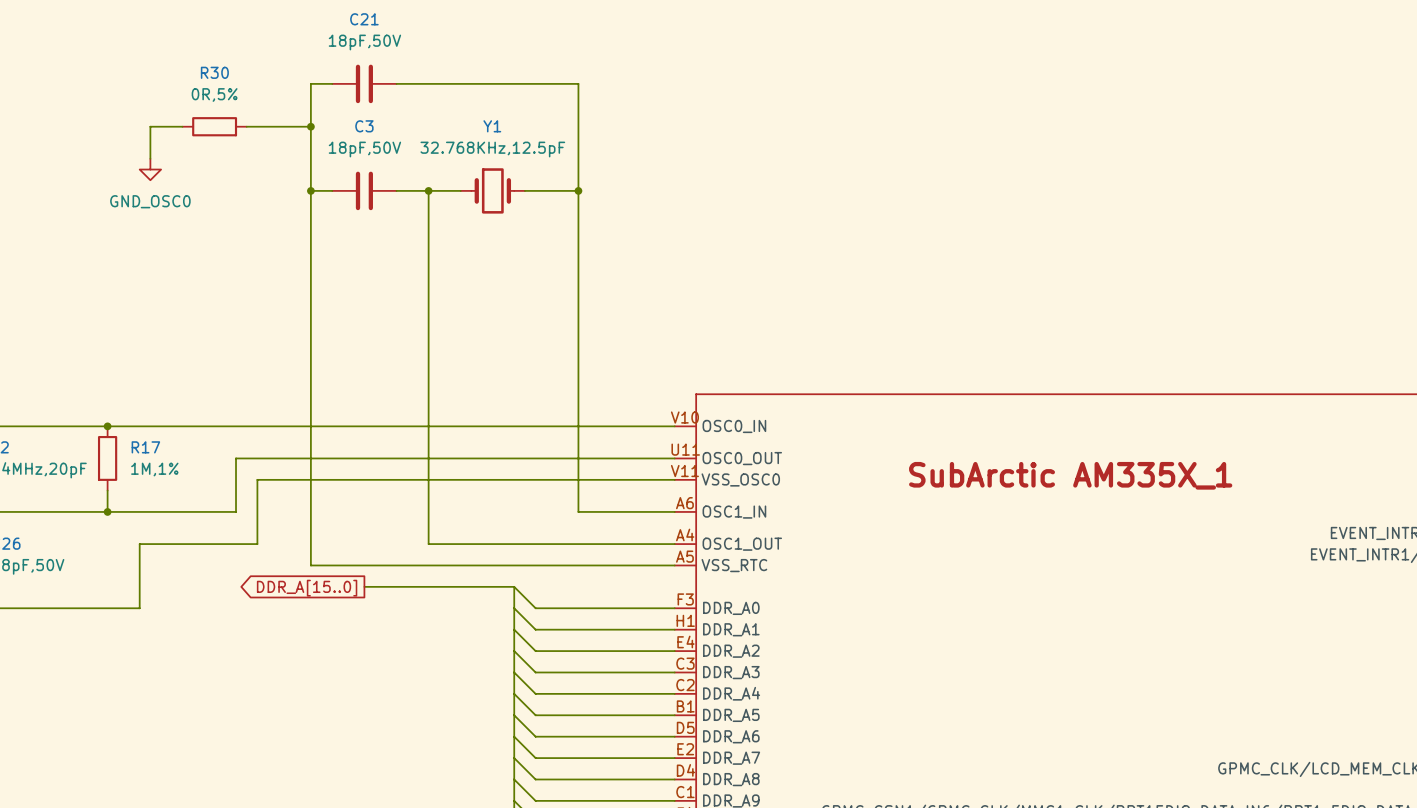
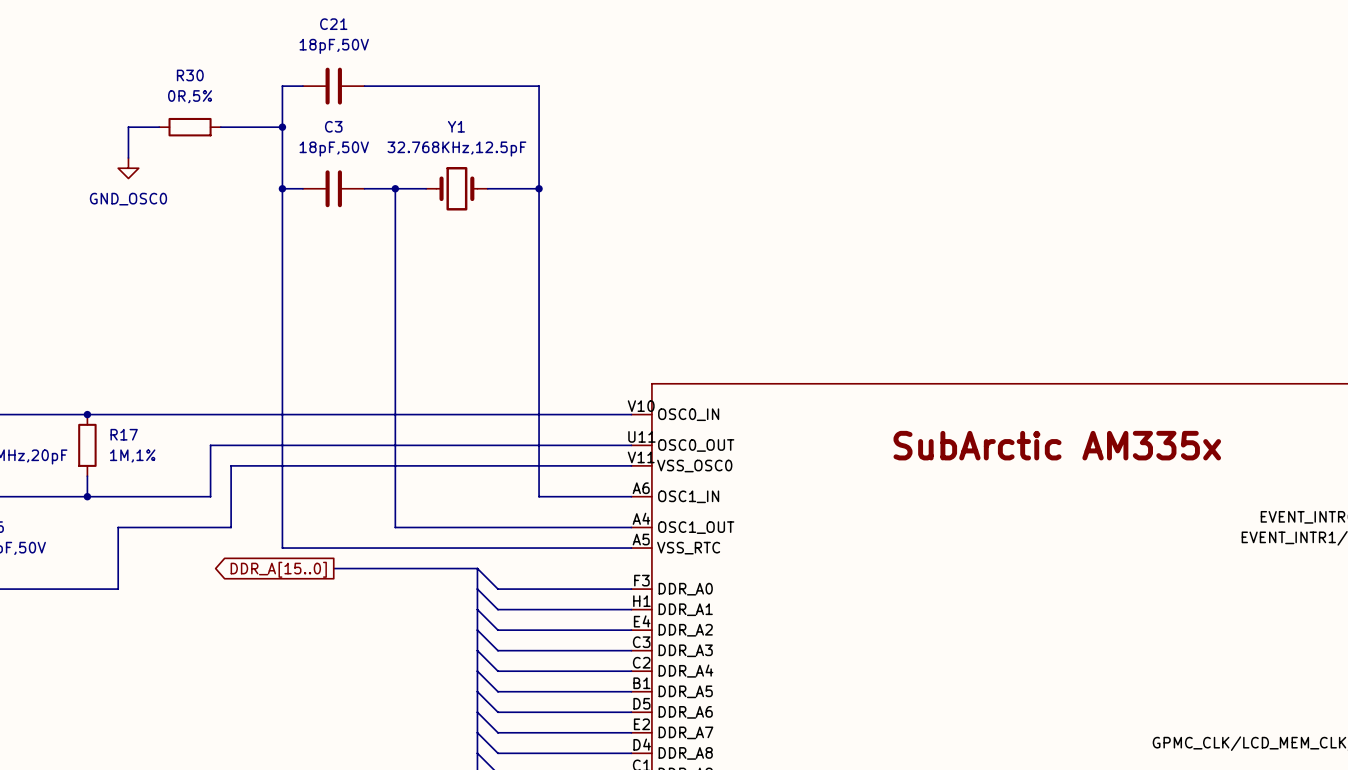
label: none -> SubArctic AM335x (1057, 445)
part text: SubArctic AM335X_1 (1070, 475) -> none

